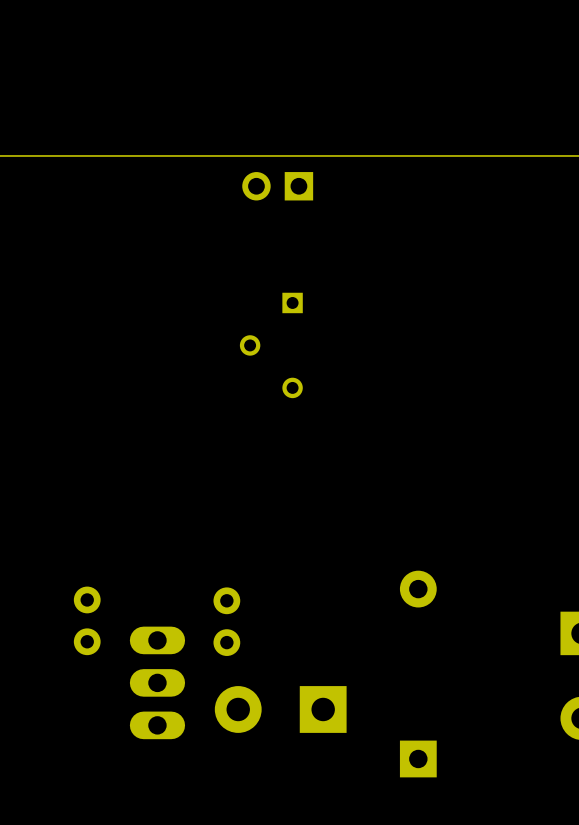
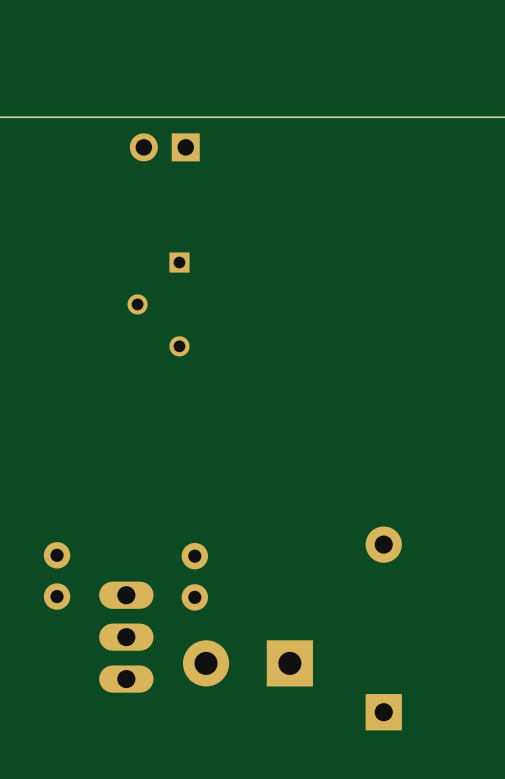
part position: (277, 186) -> (164, 147)
part position: (271, 345) -> (158, 304)

